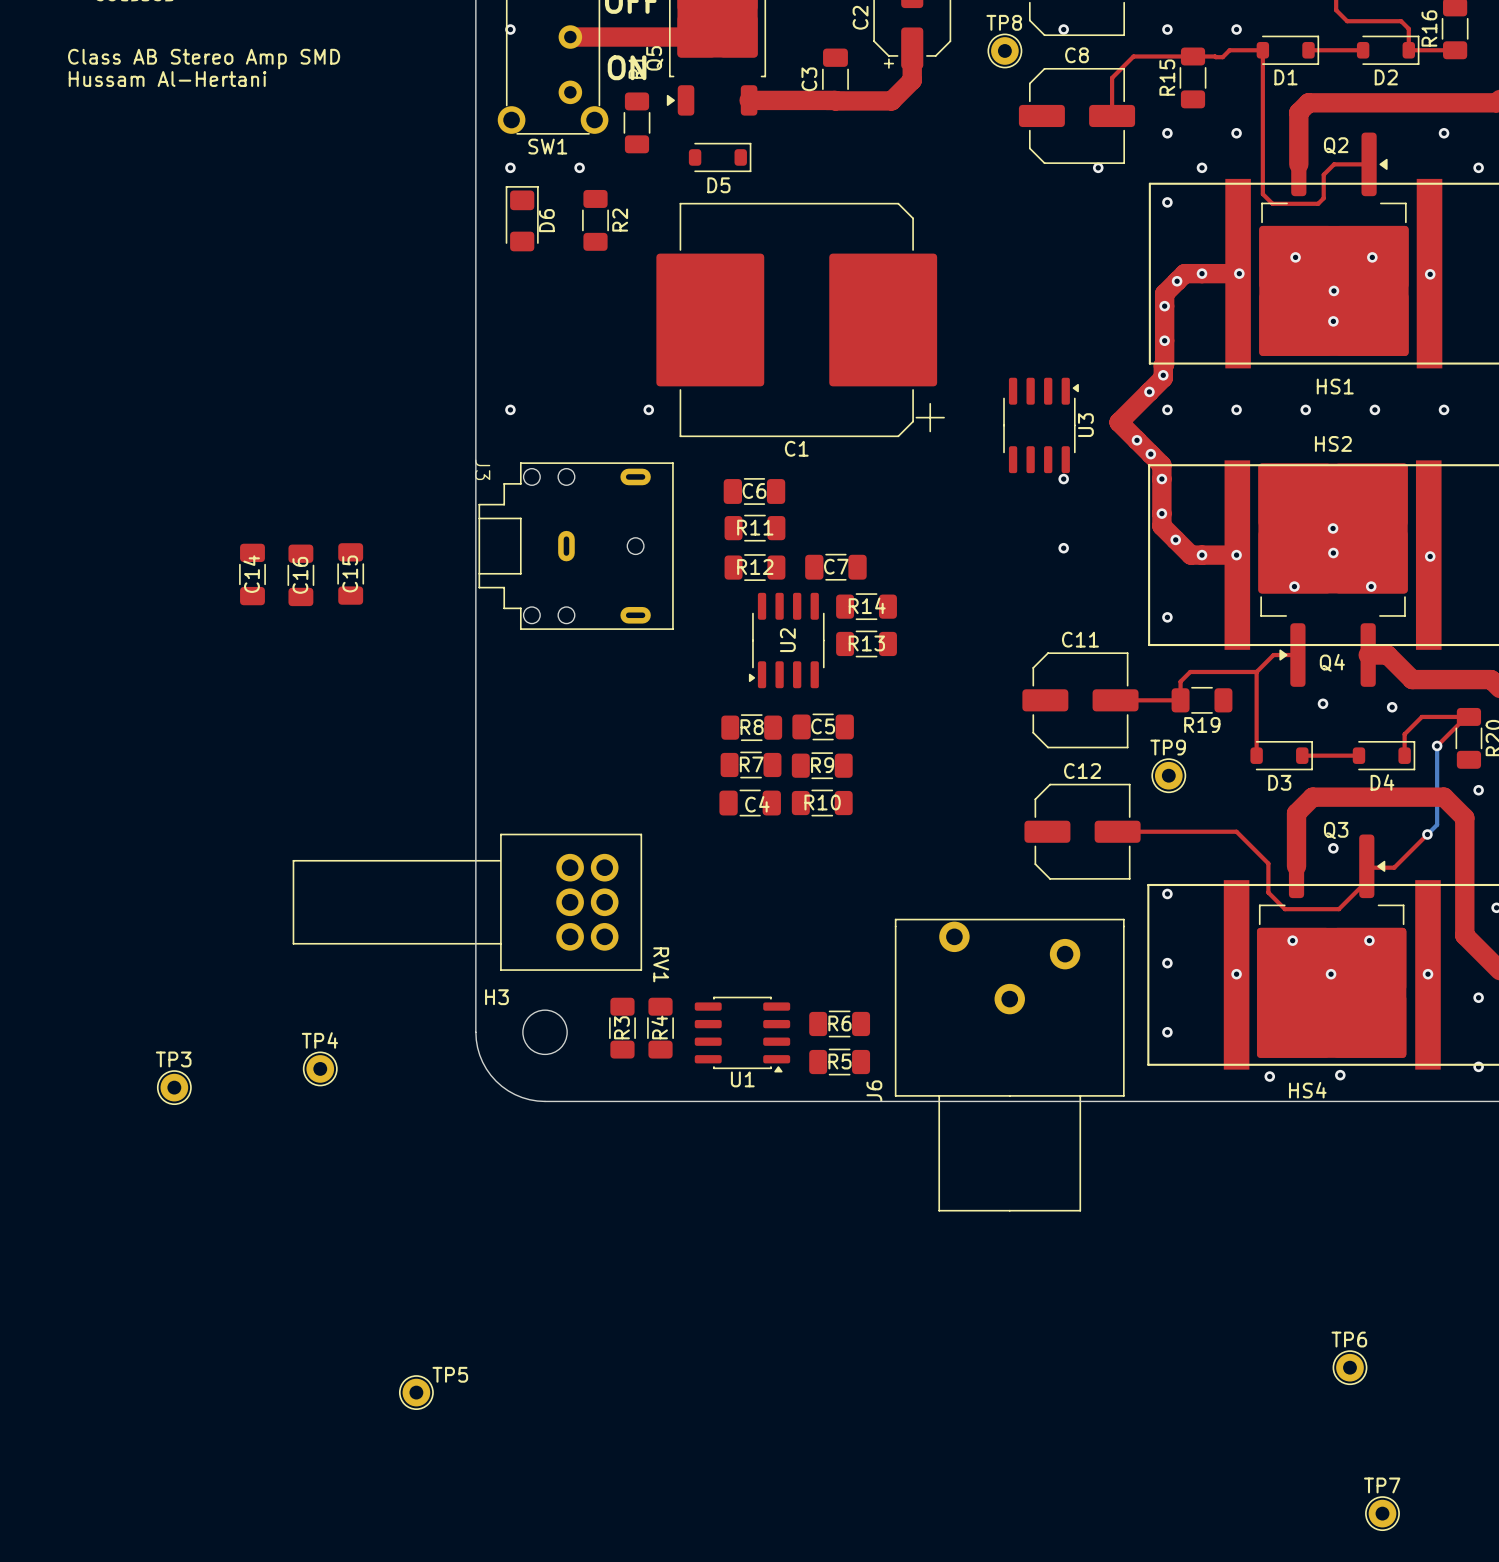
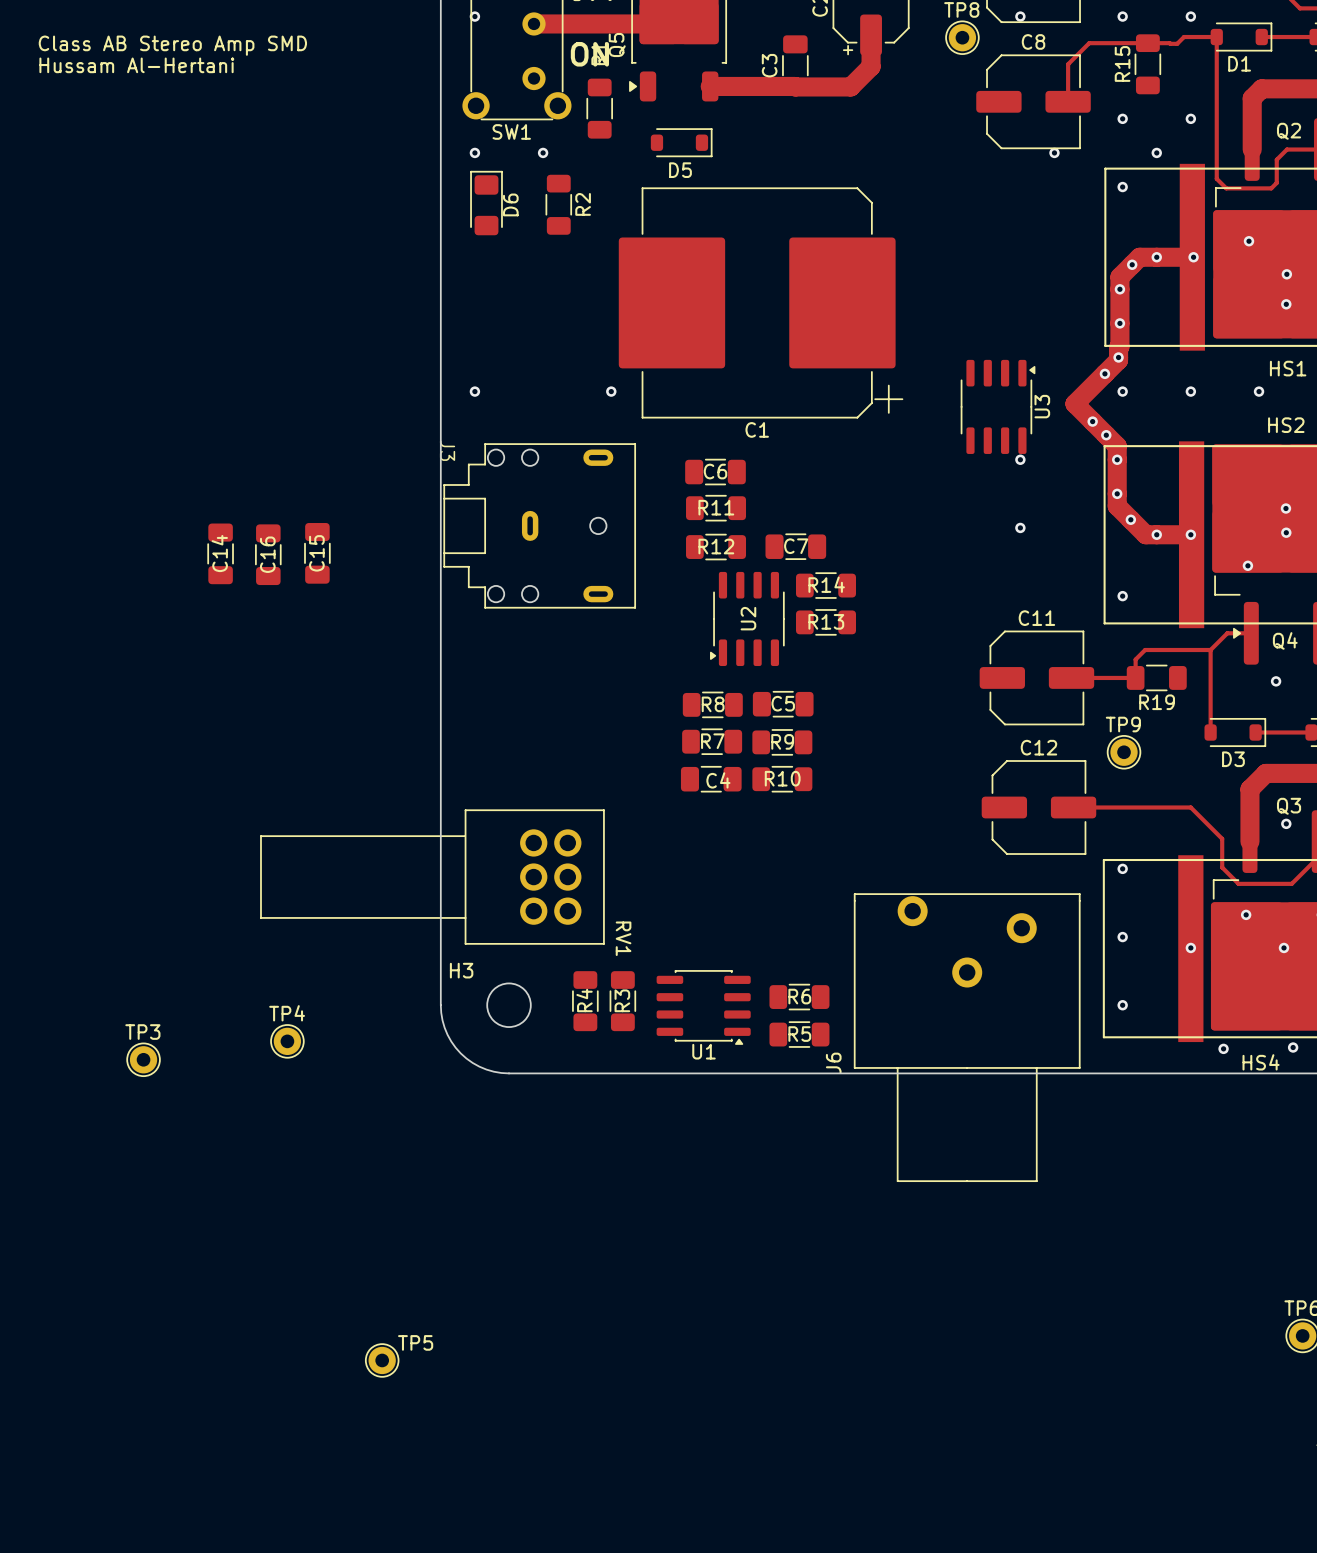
R3 name: R3 (621, 1027) -> R4 (584, 1000)
R4 name: R4 (659, 1027) -> R3 (622, 1000)

